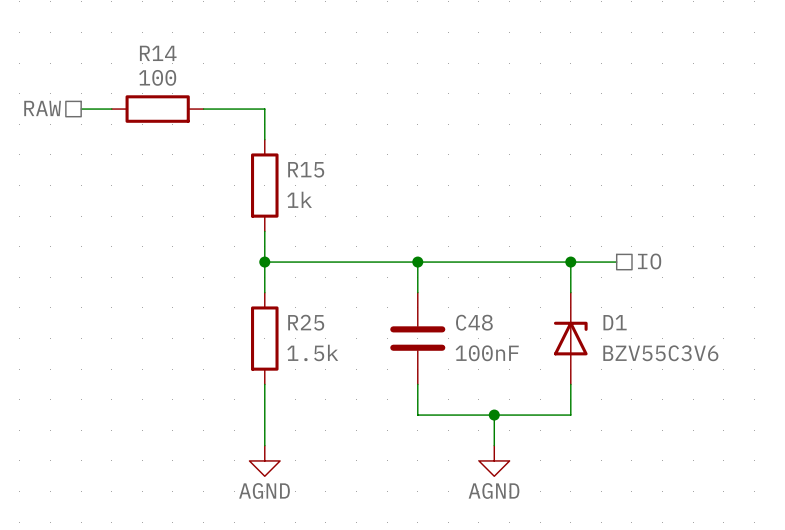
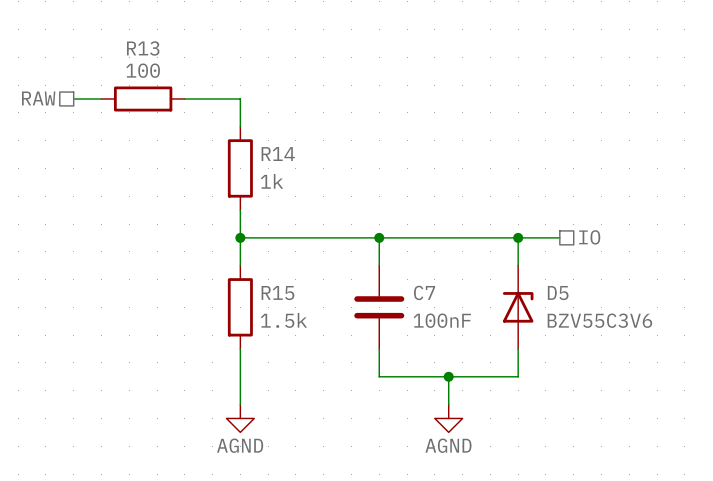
R14 name: R14 (158, 53) -> R13 (143, 48)
R15 name: R15 (306, 169) -> R14 (278, 154)
R25 name: R25 (306, 322) -> R15 (277, 293)
C48 name: C48 (474, 322) -> C7 (424, 292)
D1 name: D1 (615, 322) -> D5 (558, 293)

